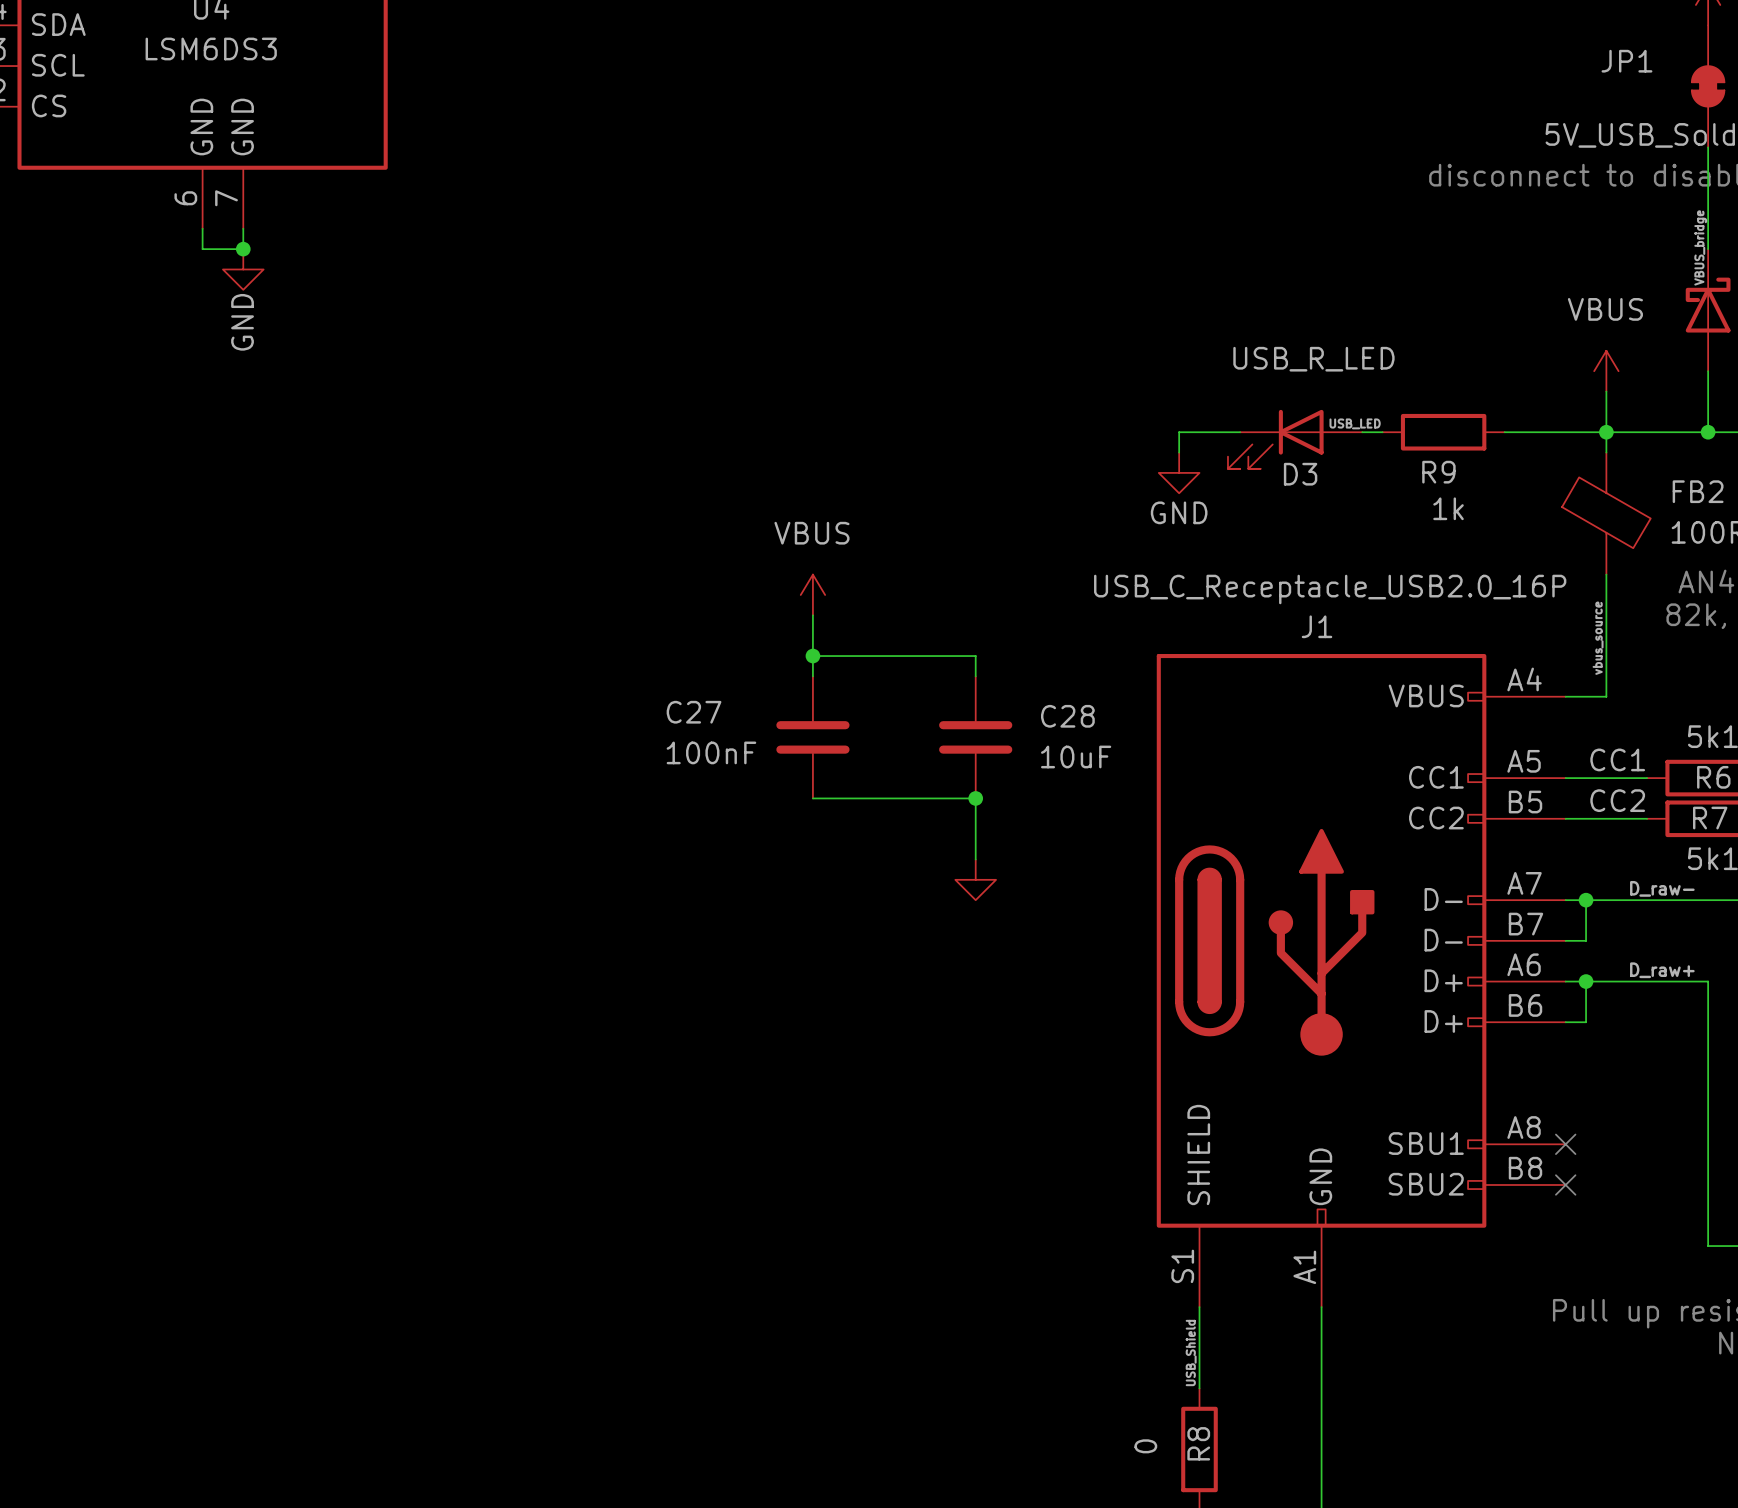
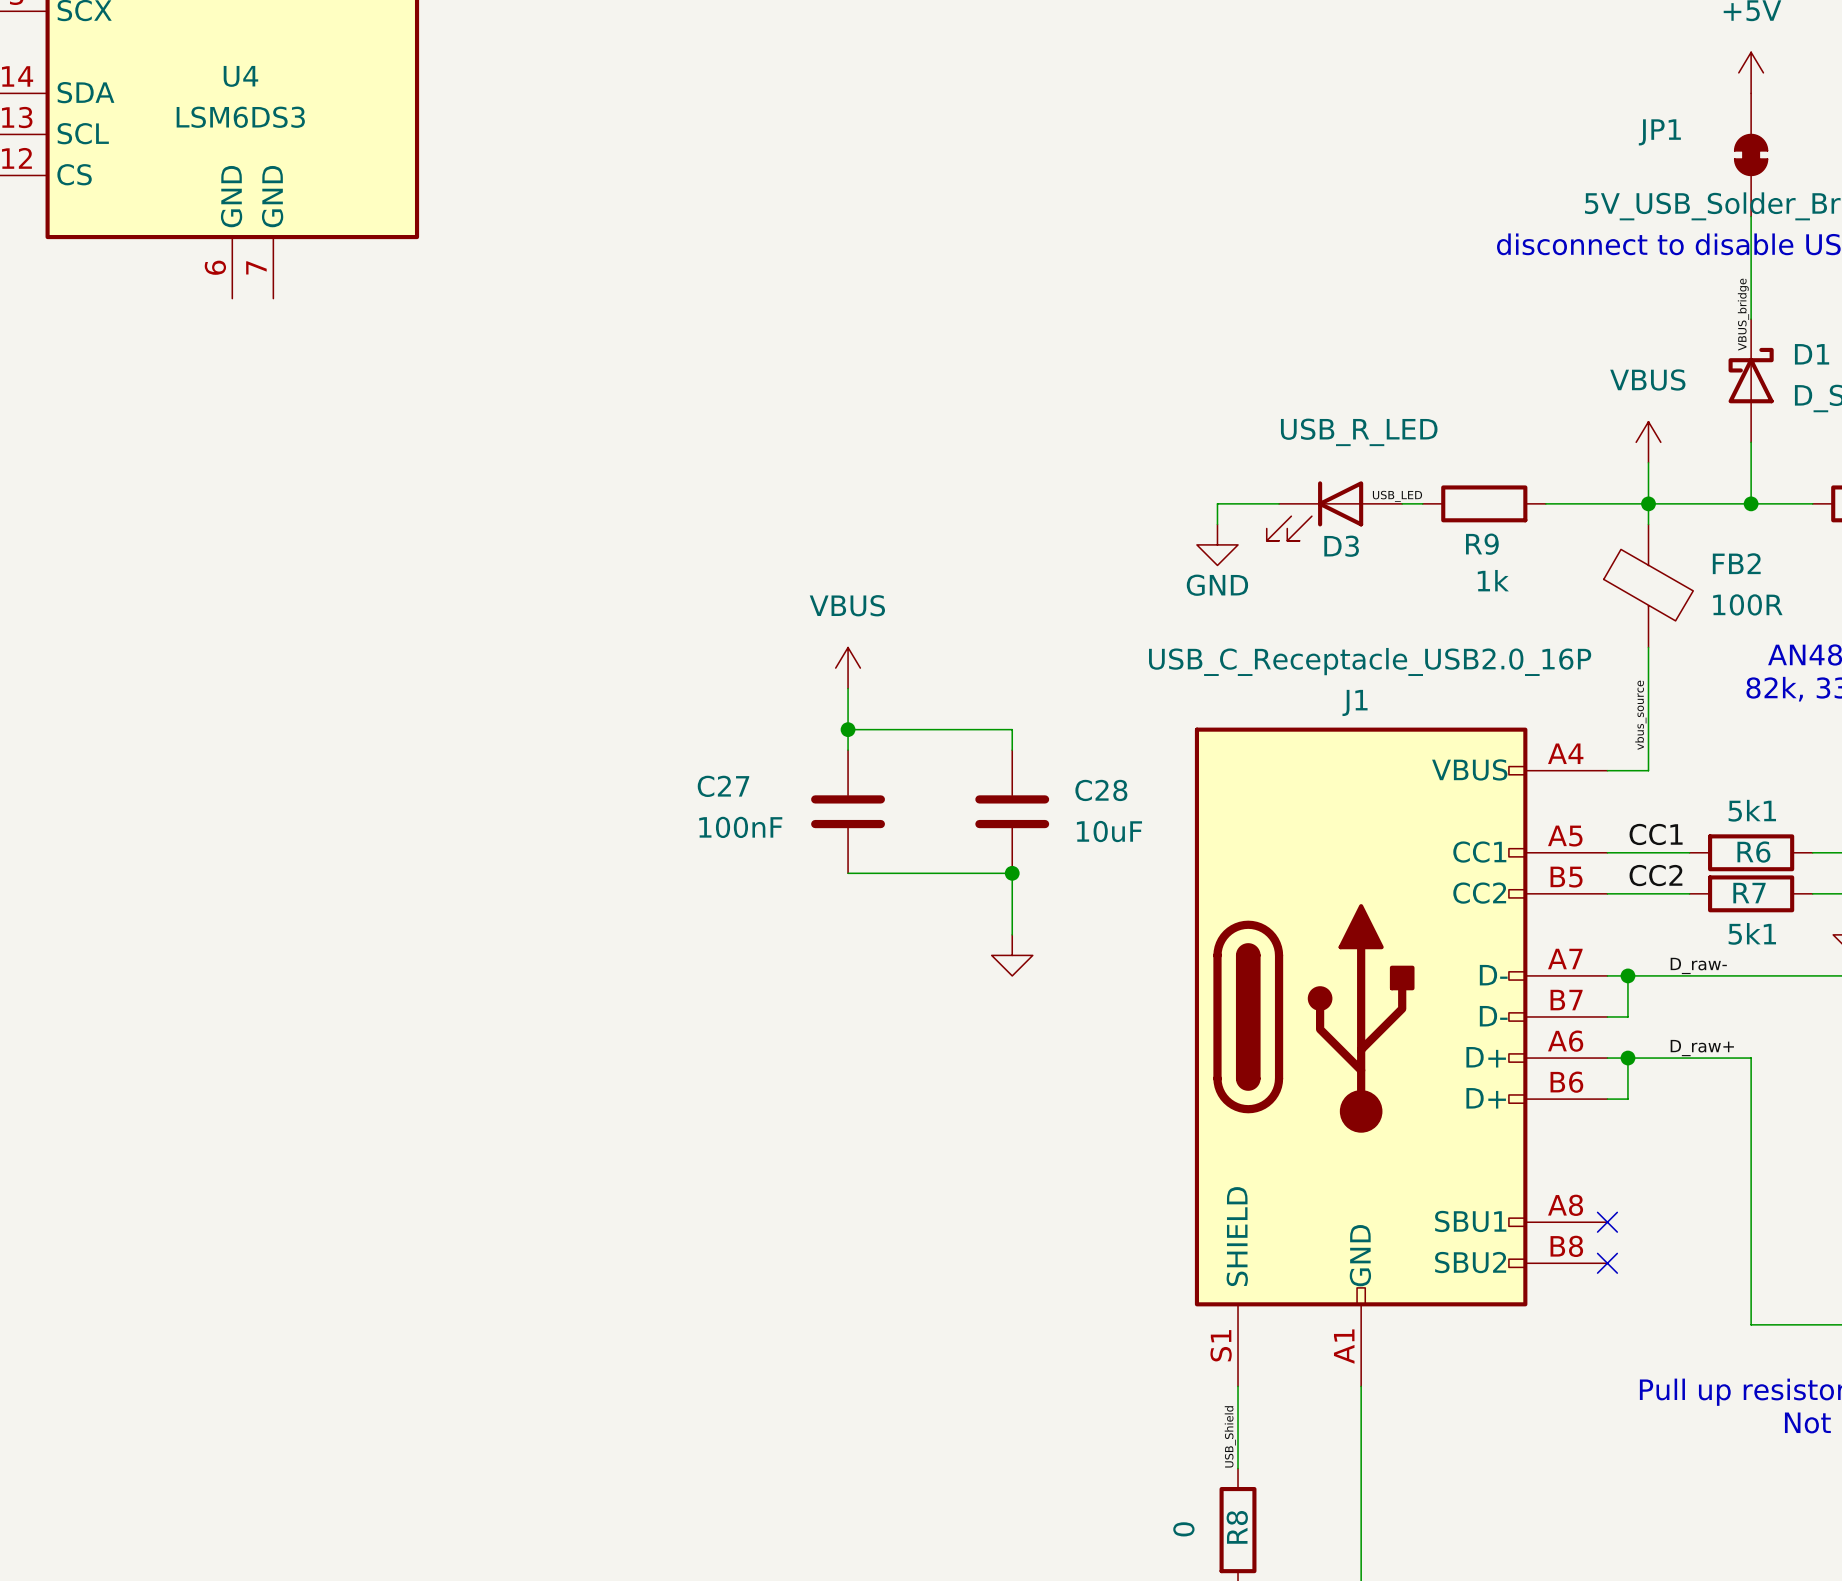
wire: (202, 228) (202, 249) (243, 249) (243, 228) -> none
junction: (243, 249) -> none
power symbol: GND (243, 269) -> none

